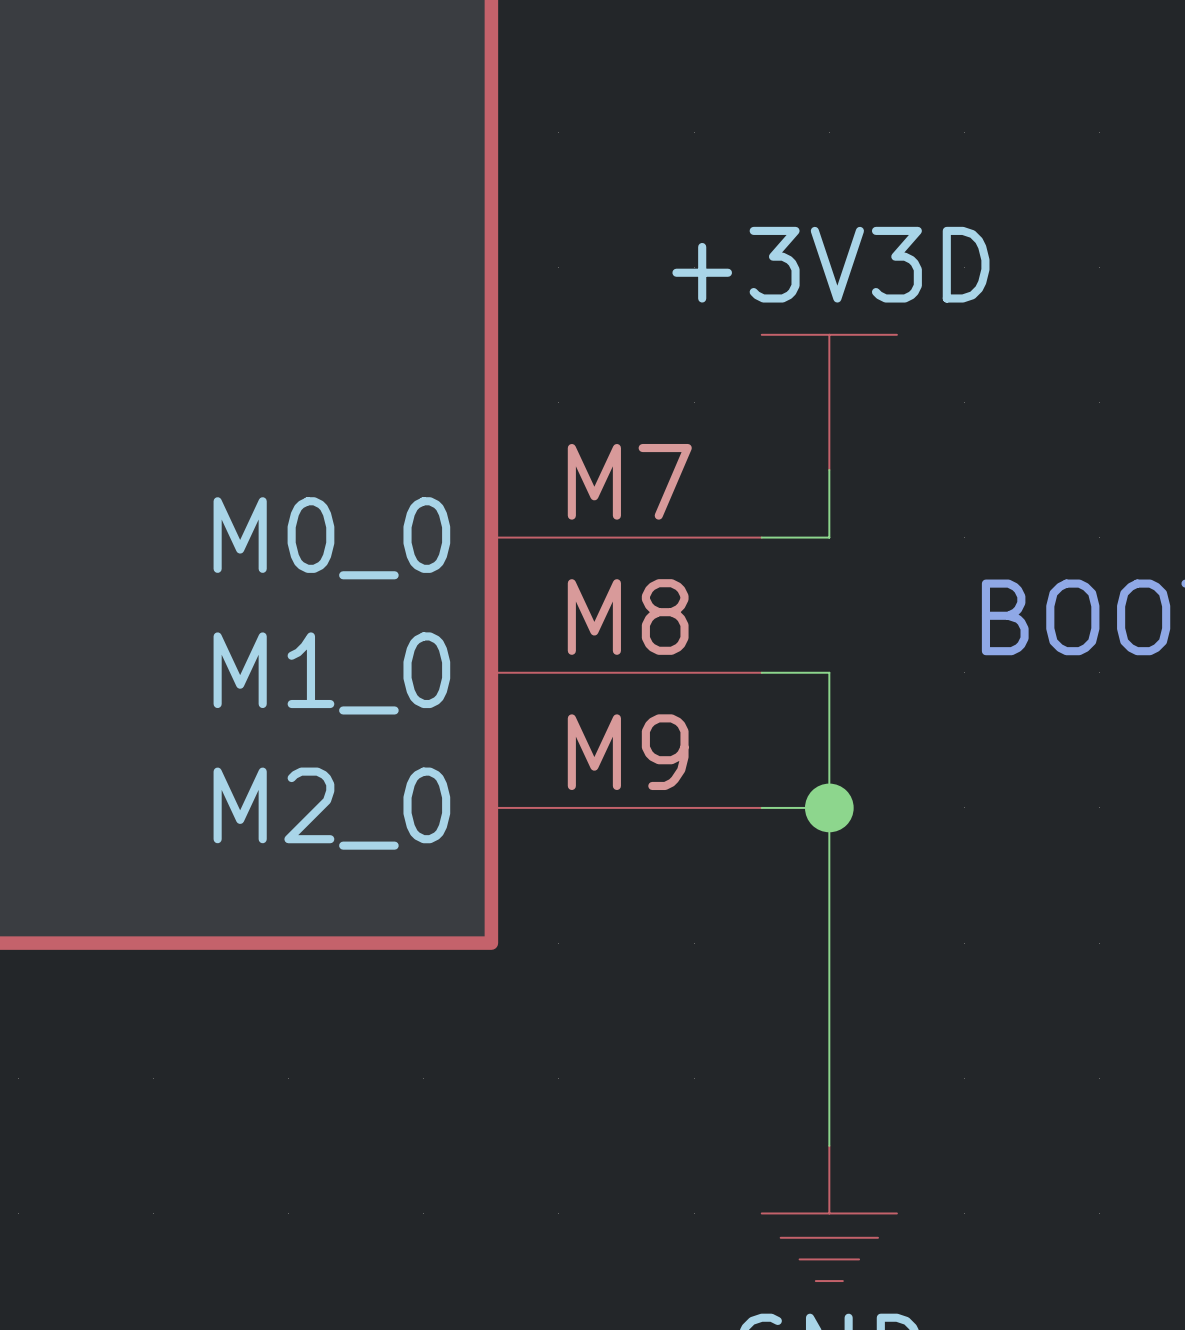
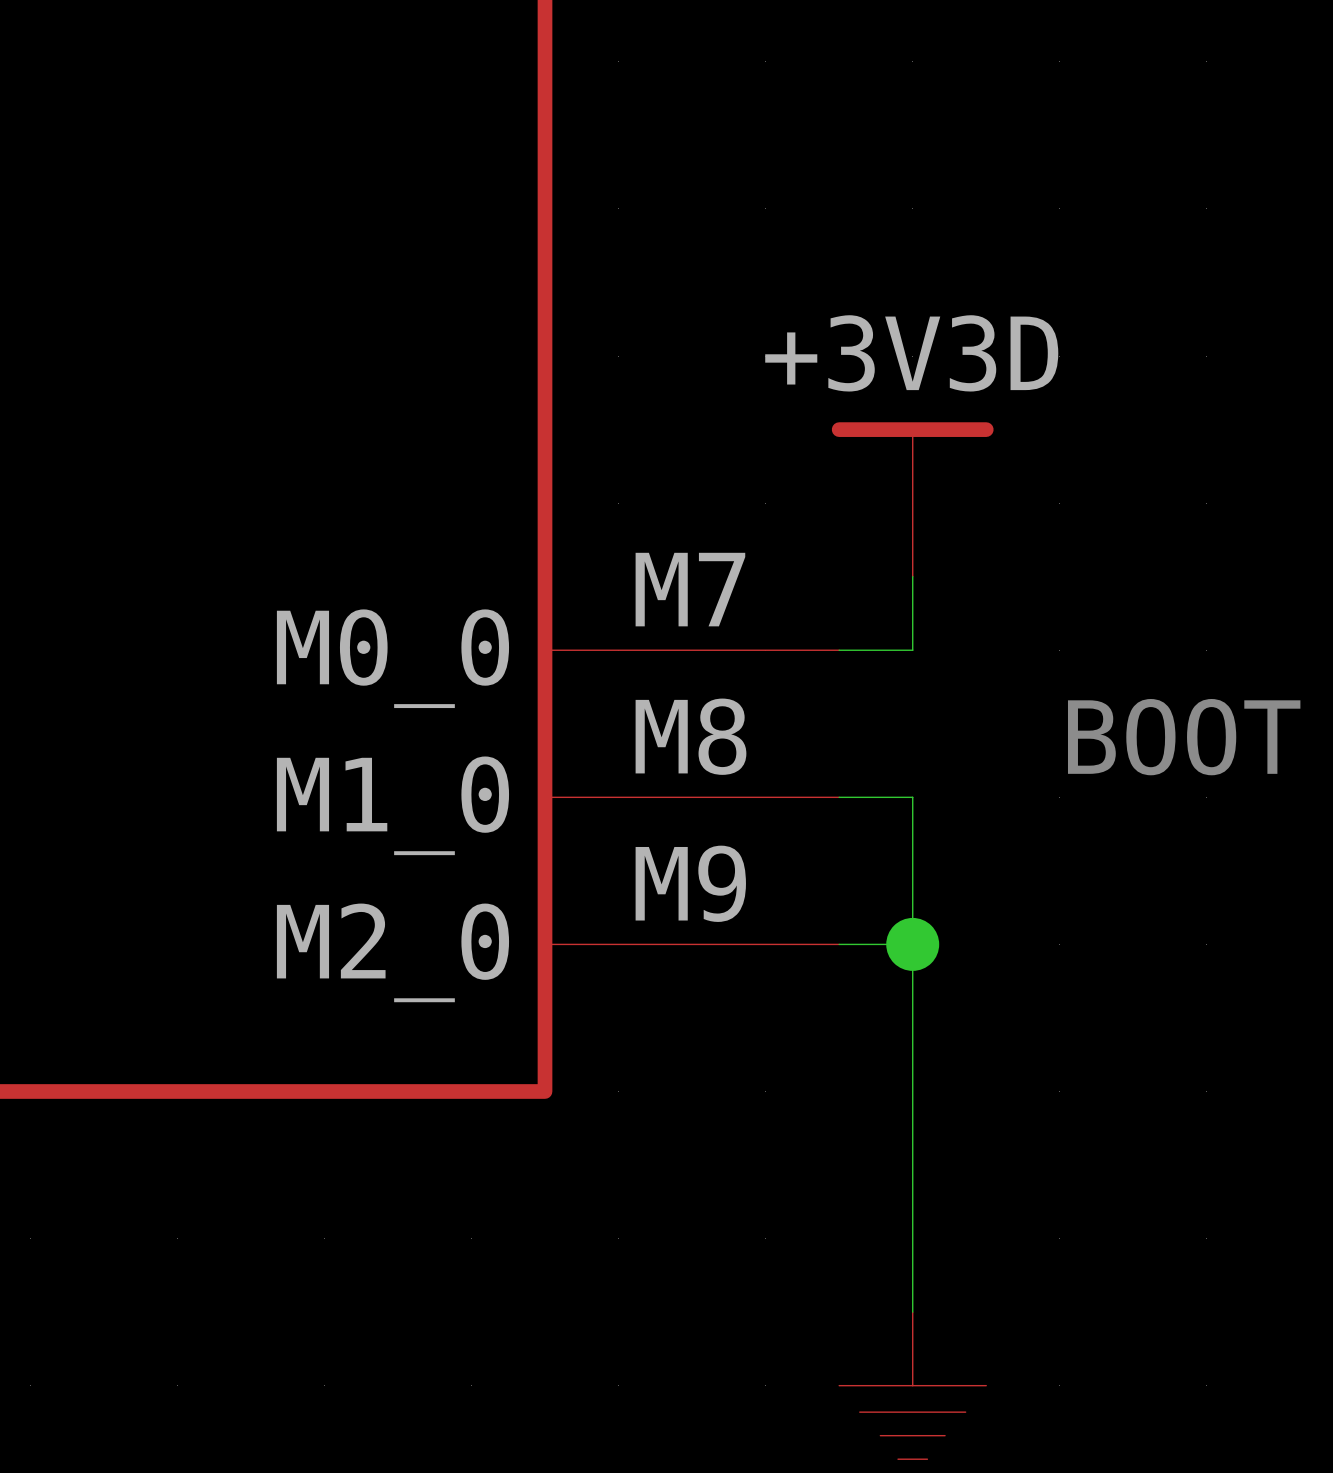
power symbol shape: [761, 334, 897, 470] -> [831, 422, 994, 577]

